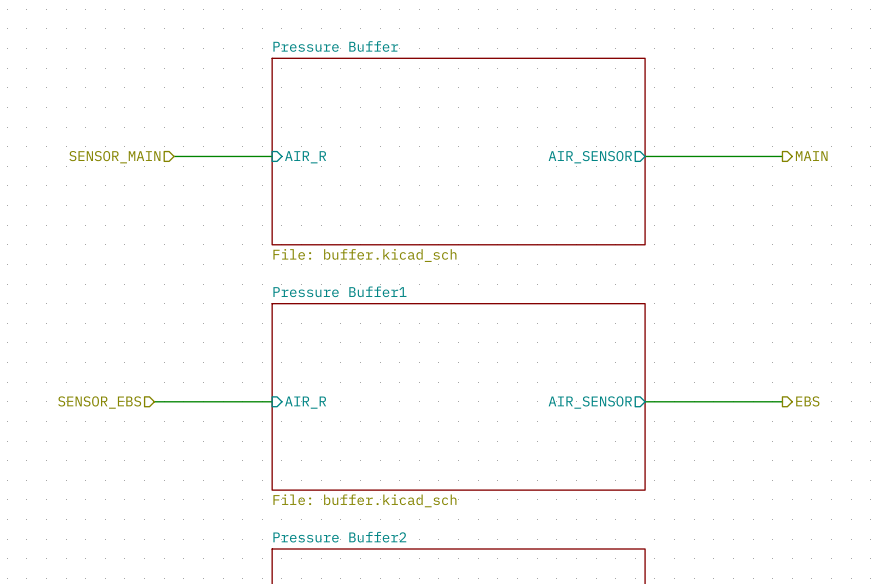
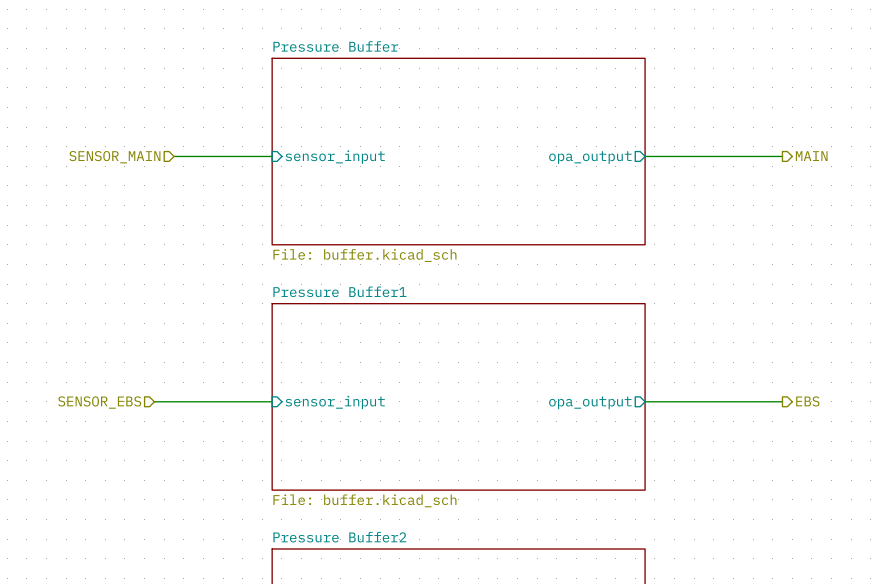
sheet pin: AIR_R (305, 157) -> sensor_input (335, 157)
sheet pin: AIR_SENSOR (590, 157) -> opa_output (590, 157)
sheet pin: AIR_R (305, 402) -> sensor_input (335, 402)
sheet pin: AIR_SENSOR (590, 402) -> opa_output (590, 402)

